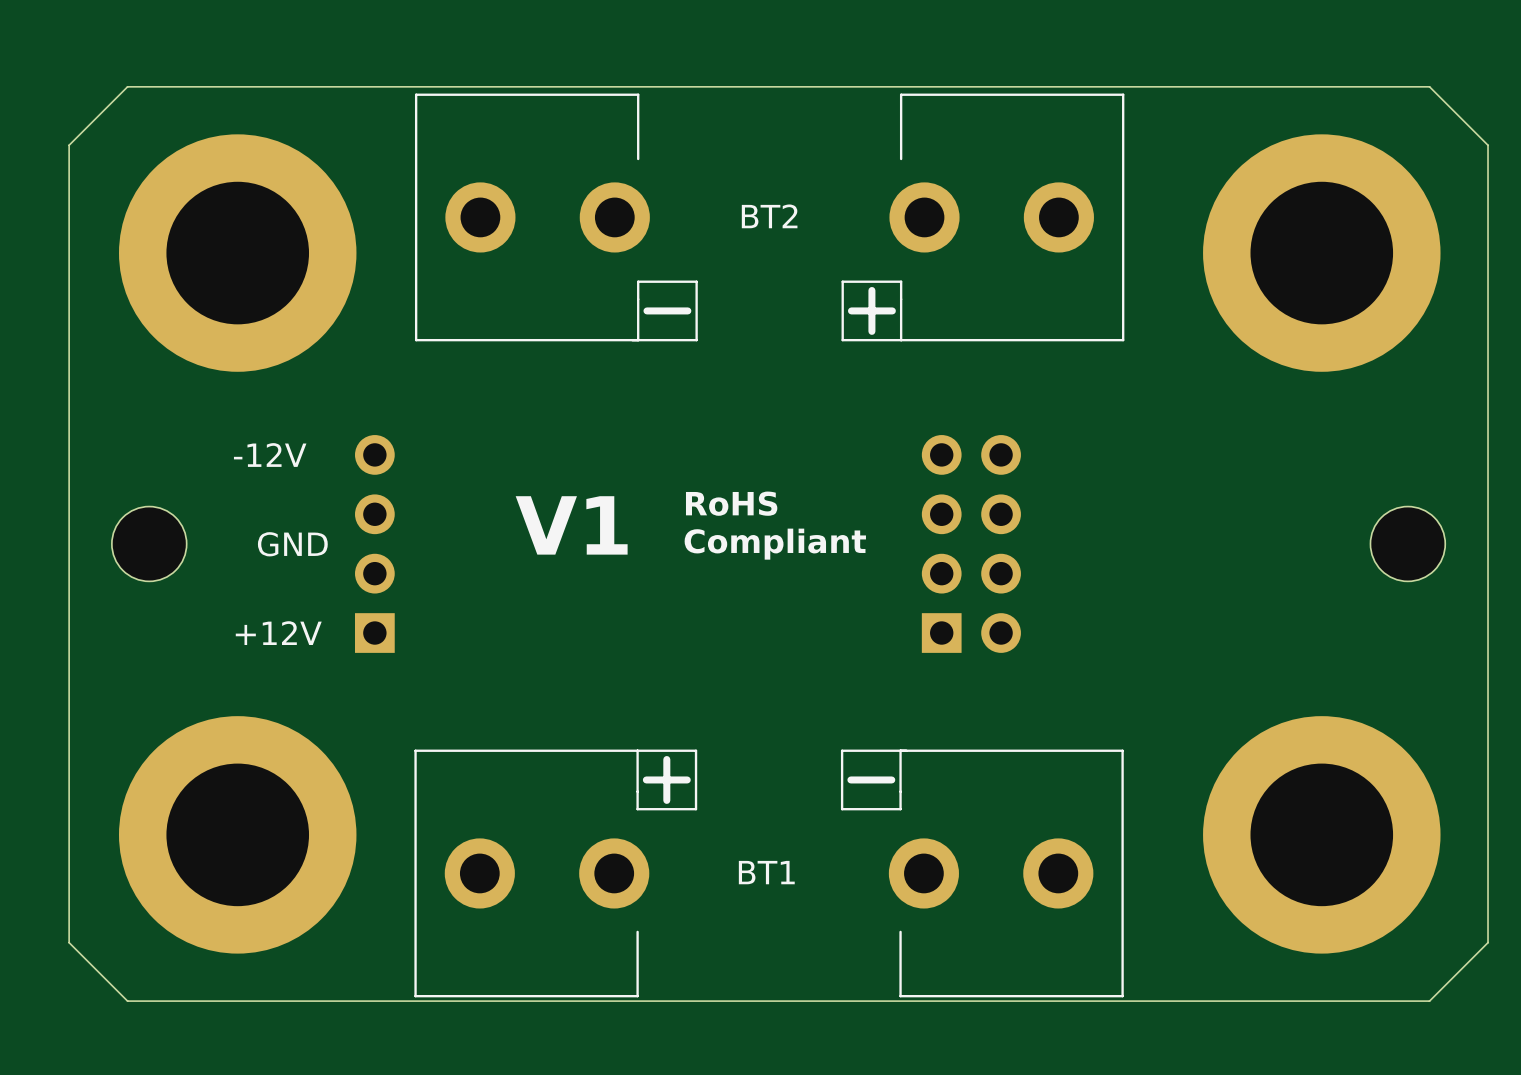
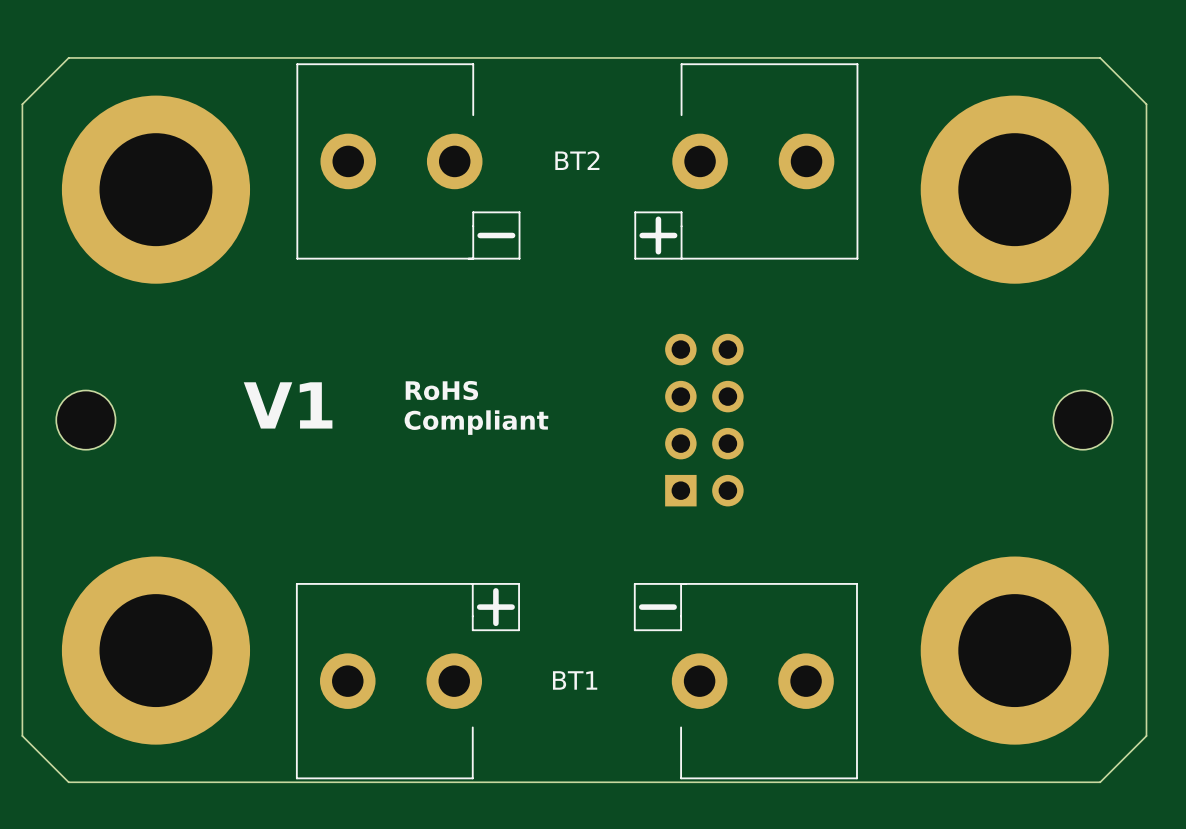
text: -12V (270, 455) -> none
text position: RoHS (731, 503) -> RoHS (441, 390)
text position: V1 (571, 525) -> V1 (288, 405)
part: (374, 543) -> none
part position: (971, 543) -> (704, 420)
text: GND (292, 544) -> none
text position: Compliant (775, 544) -> Compliant (476, 422)
text: +12V (278, 633) -> none

